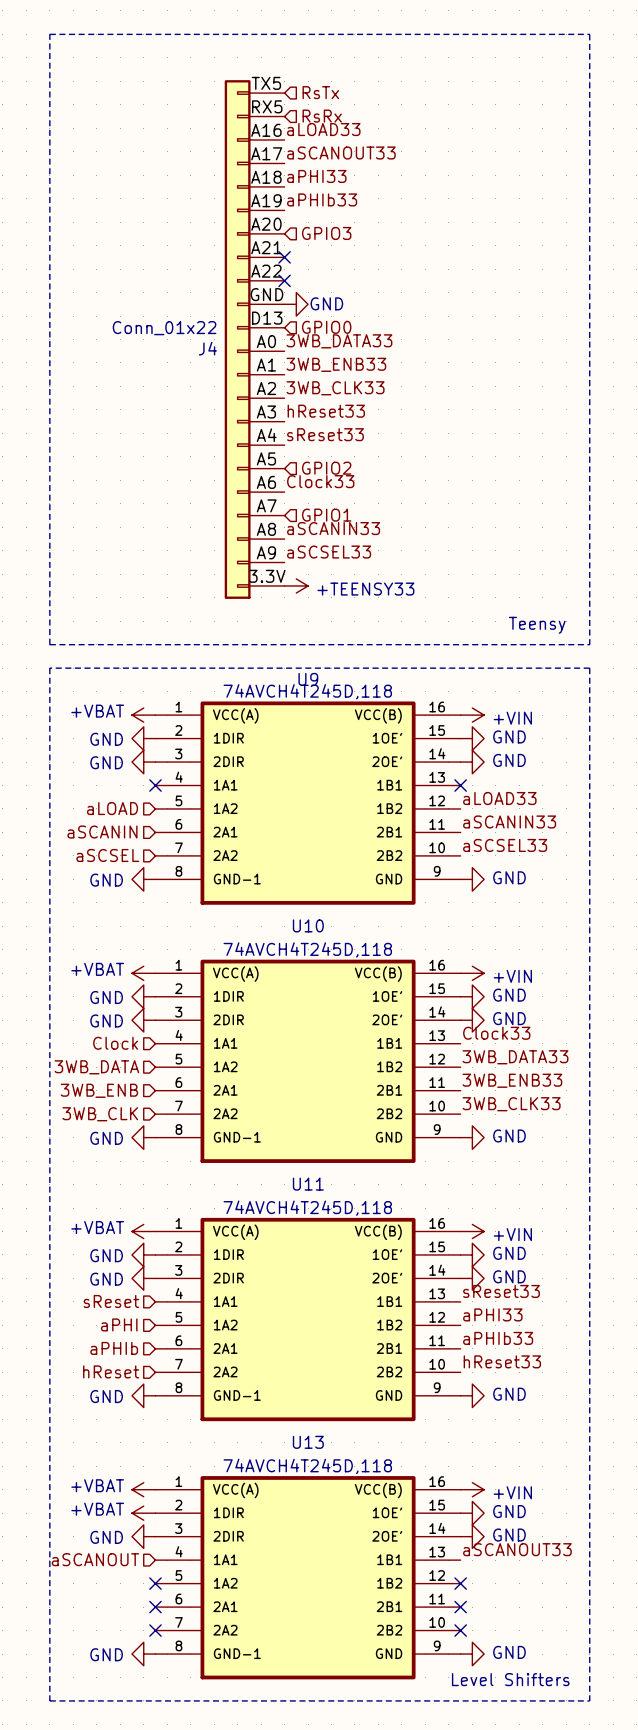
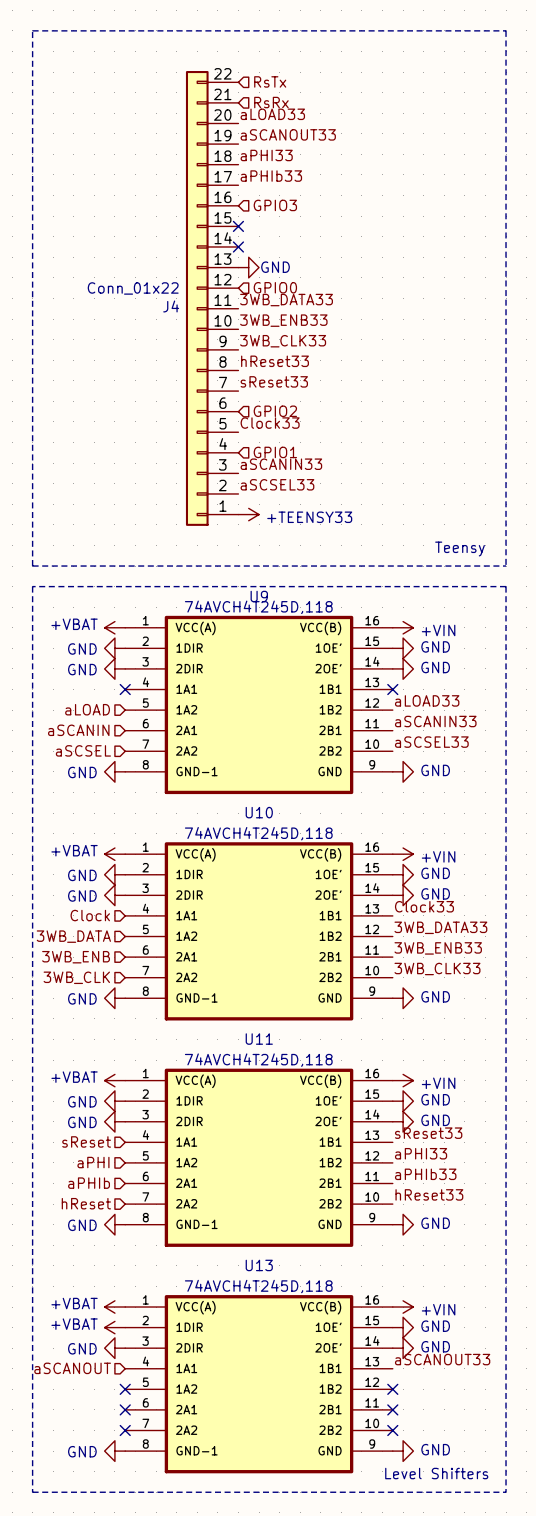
J4 symbol: [224, 80, 285, 599] -> [185, 71, 239, 526]

